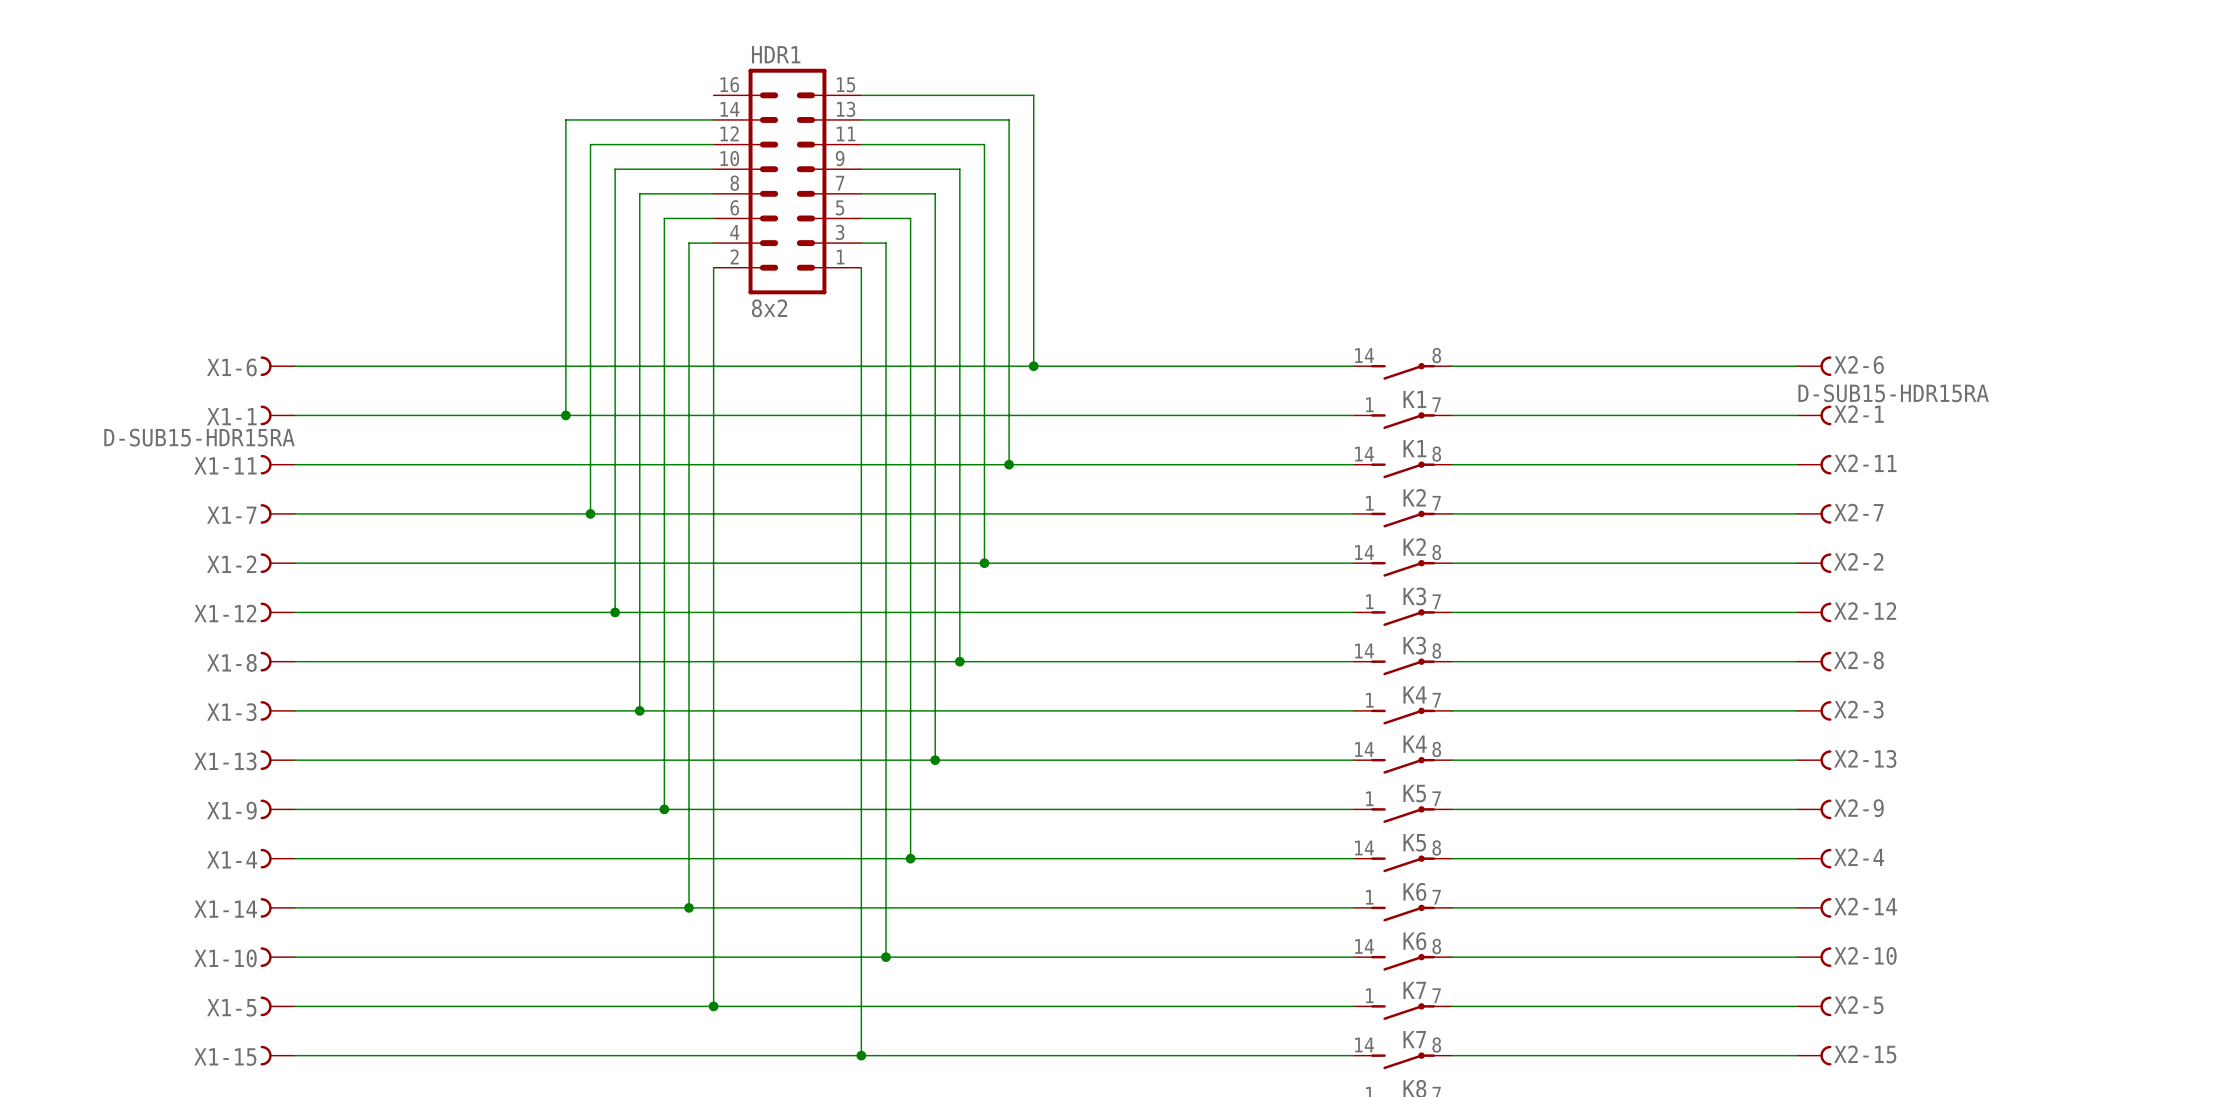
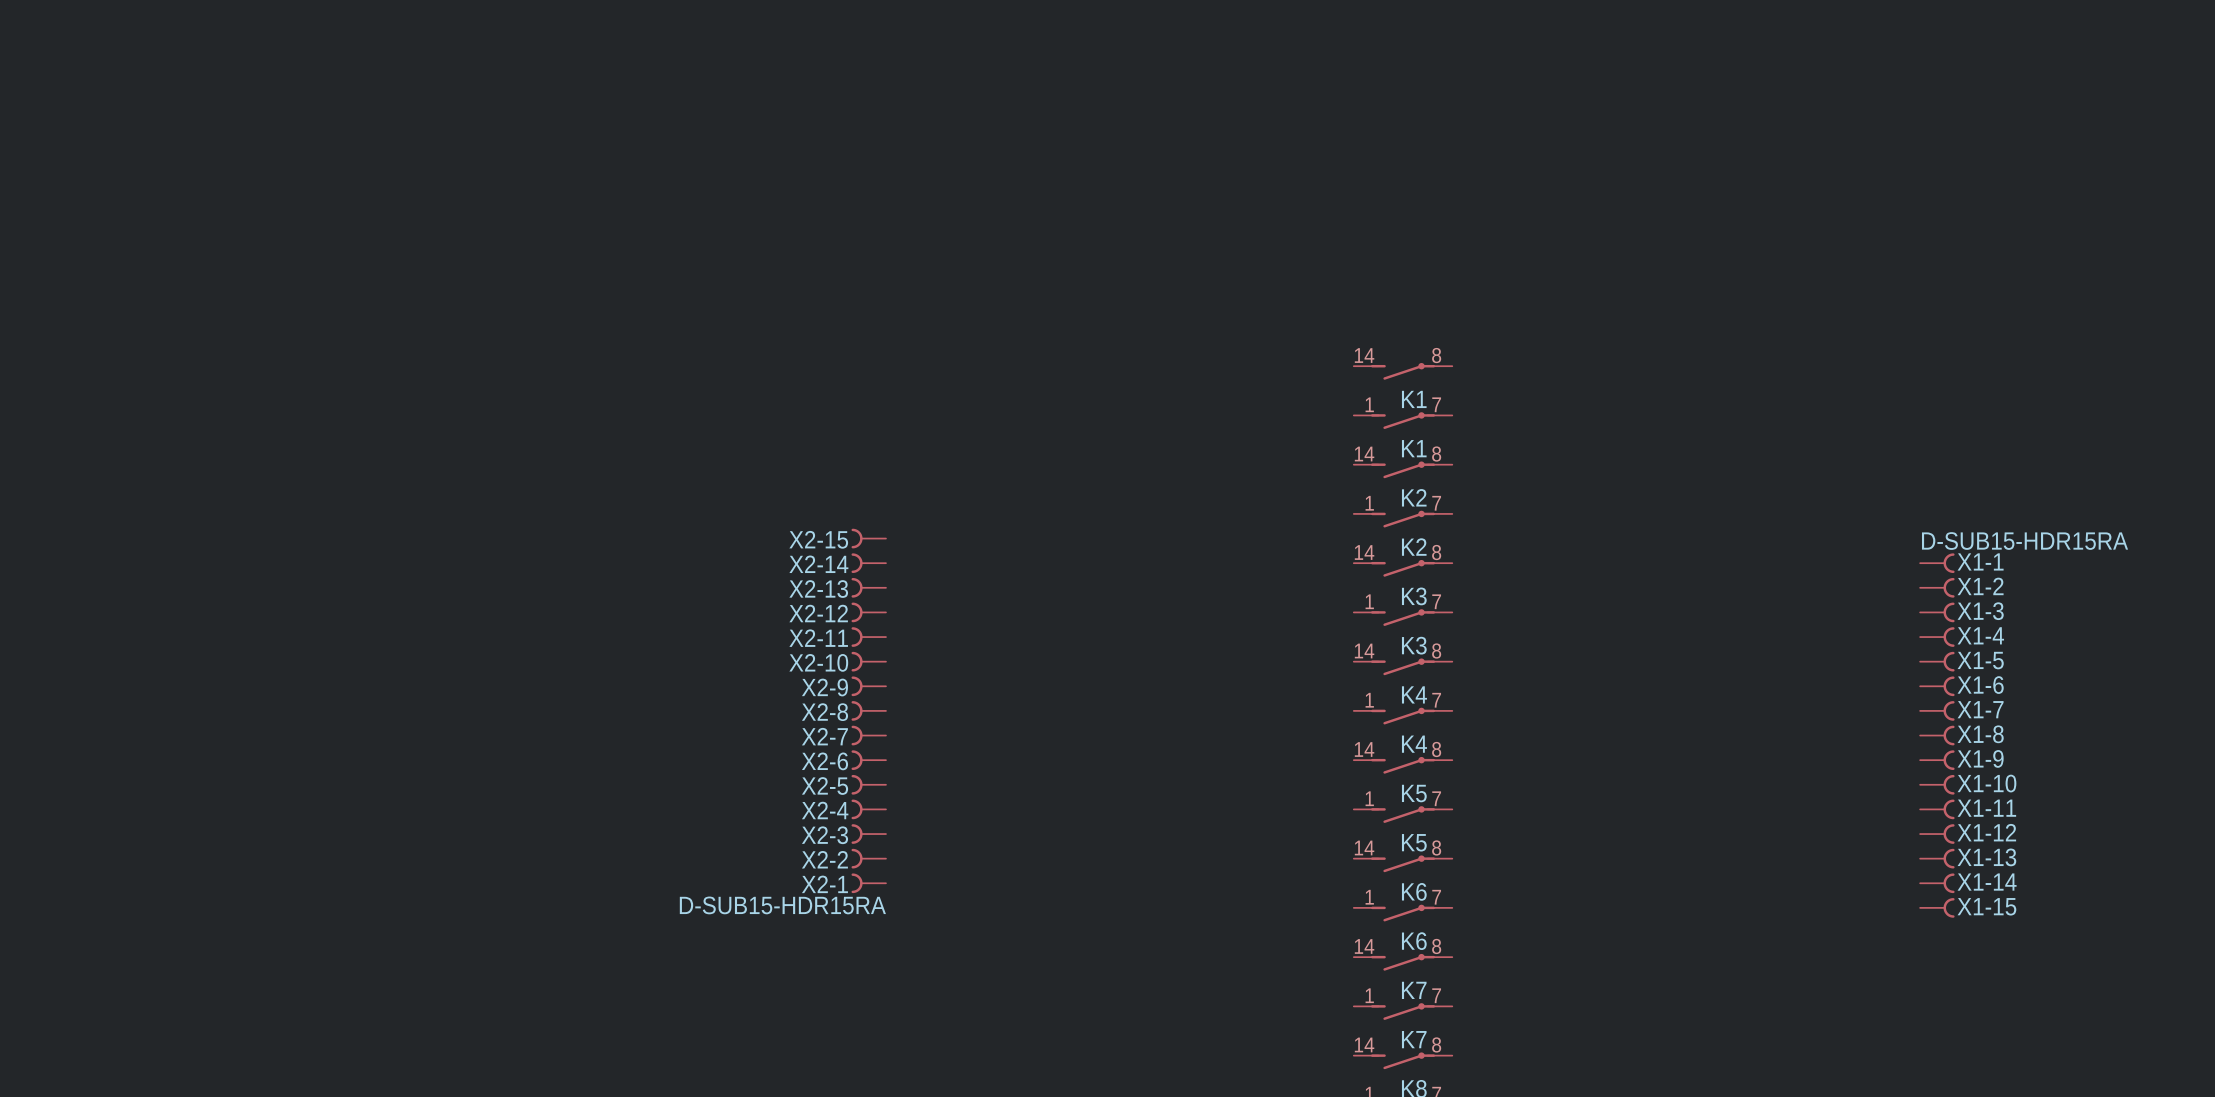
wire: (861, 95) (1033, 95) (1033, 366) -> none
wire: (713, 119) (565, 119) (565, 415) -> none
wire: (861, 119) (1009, 119) (1009, 464) -> none
wire: (713, 144) (590, 144) (590, 513) -> none
wire: (861, 144) (984, 144) (984, 563) -> none
wire: (713, 169) (615, 169) (615, 612) -> none
wire: (861, 169) (959, 169) (959, 661) -> none
HDR1: 8x2 (787, 181) -> none
wire: (713, 193) (639, 193) (639, 710) -> none
wire: (861, 193) (935, 193) (935, 760) -> none
wire: (713, 218) (664, 218) (664, 809) -> none
wire: (861, 218) (910, 218) (910, 858) -> none
wire: (713, 243) (688, 243) (688, 907) -> none
wire: (861, 243) (885, 243) (885, 957) -> none
wire: (713, 267) (713, 1006) -> none
wire: (861, 267) (861, 1055) -> none
X1-6 rotation: 0° (266, 366) -> 180° (1949, 686)
X1-6 position: (277, 366) -> (1937, 686)
wire: (295, 366) (1353, 366) -> none
junction: (1033, 366) -> none
wire: (1452, 366) (1797, 366) -> none
X2-6 position: (1814, 366) -> (868, 760)
X2-6 rotation: 0° (1825, 366) -> 180° (857, 760)
X1-1 rotation: 0° (266, 415) -> 180° (1949, 563)
X1-1 position: (277, 415) -> (1937, 563)
wire: (295, 415) (1353, 415) -> none
junction: (565, 415) -> none
wire: (1452, 415) (1797, 415) -> none
X2-1 position: (1814, 415) -> (868, 883)
X2-1 rotation: 0° (1825, 415) -> 180° (857, 883)
X1-11 rotation: 0° (266, 464) -> 180° (1949, 809)
X1-11 position: (277, 464) -> (1937, 809)
wire: (295, 464) (1353, 464) -> none
junction: (1009, 464) -> none
wire: (1452, 464) (1797, 464) -> none
X2-11 position: (1814, 464) -> (868, 637)
X2-11 rotation: 0° (1825, 464) -> 180° (857, 637)
X1-7 rotation: 0° (266, 513) -> 180° (1949, 710)
X1-7 position: (277, 513) -> (1937, 710)
wire: (295, 513) (1353, 513) -> none
junction: (590, 513) -> none
wire: (1452, 513) (1797, 513) -> none
X2-7 position: (1814, 513) -> (868, 735)
X2-7 rotation: 0° (1825, 513) -> 180° (857, 735)
X1-2 rotation: 0° (266, 563) -> 180° (1949, 587)
X1-2 position: (277, 563) -> (1937, 587)
wire: (295, 563) (1353, 563) -> none
junction: (984, 563) -> none
wire: (1452, 563) (1797, 563) -> none
X2-2 position: (1814, 563) -> (868, 858)
X2-2 rotation: 0° (1825, 563) -> 180° (857, 858)
X1-12 rotation: 0° (266, 612) -> 180° (1949, 834)
X1-12 position: (277, 612) -> (1937, 834)
wire: (295, 612) (1353, 612) -> none
junction: (615, 612) -> none
wire: (1452, 612) (1797, 612) -> none
X2-12 position: (1814, 612) -> (868, 612)
X2-12 rotation: 0° (1825, 612) -> 180° (857, 612)
X1-8 rotation: 0° (266, 661) -> 180° (1949, 735)
X1-8 position: (277, 661) -> (1937, 735)
wire: (295, 661) (1353, 661) -> none
junction: (959, 661) -> none
wire: (1452, 661) (1797, 661) -> none
X2-8 position: (1814, 661) -> (868, 710)
X2-8 rotation: 0° (1825, 661) -> 180° (857, 710)
X1-3 rotation: 0° (266, 710) -> 180° (1949, 612)
X1-3 position: (277, 710) -> (1937, 612)
wire: (295, 710) (1353, 710) -> none
junction: (639, 710) -> none
wire: (1452, 710) (1797, 710) -> none
X2-3 position: (1814, 710) -> (868, 834)
X2-3 rotation: 0° (1825, 710) -> 180° (857, 834)
X1-13 rotation: 0° (266, 760) -> 180° (1949, 858)
X1-13 position: (277, 760) -> (1937, 858)
wire: (295, 760) (1353, 760) -> none
junction: (935, 760) -> none
wire: (1452, 760) (1797, 760) -> none
X2-13 position: (1814, 760) -> (868, 587)
X2-13 rotation: 0° (1825, 760) -> 180° (857, 587)
X1-9 rotation: 0° (266, 809) -> 180° (1949, 760)
X1-9 position: (277, 809) -> (1937, 760)
wire: (295, 809) (1353, 809) -> none
junction: (664, 809) -> none
wire: (1452, 809) (1797, 809) -> none
X2-9 position: (1814, 809) -> (868, 686)
X2-9 rotation: 0° (1825, 809) -> 180° (857, 686)
X1-4 rotation: 0° (266, 858) -> 180° (1949, 637)
X1-4 position: (277, 858) -> (1937, 637)
wire: (295, 858) (1353, 858) -> none
junction: (910, 858) -> none
wire: (1452, 858) (1797, 858) -> none
X2-4 position: (1814, 858) -> (868, 809)
X2-4 rotation: 0° (1825, 858) -> 180° (857, 809)
X1-14 rotation: 0° (266, 907) -> 180° (1949, 883)
X1-14 position: (277, 907) -> (1937, 883)
wire: (295, 907) (1353, 907) -> none
junction: (688, 907) -> none
wire: (1452, 907) (1797, 907) -> none
X2-14 position: (1814, 907) -> (868, 563)
X2-14 rotation: 0° (1825, 907) -> 180° (857, 563)
X1-10 rotation: 0° (266, 957) -> 180° (1949, 784)
X1-10 position: (277, 957) -> (1937, 784)
wire: (295, 957) (1353, 957) -> none
junction: (885, 957) -> none
wire: (1452, 957) (1797, 957) -> none
X2-10 position: (1814, 957) -> (868, 661)
X2-10 rotation: 0° (1825, 957) -> 180° (857, 661)
X1-5 rotation: 0° (266, 1006) -> 180° (1949, 661)
X1-5 position: (277, 1006) -> (1937, 661)
wire: (295, 1006) (1353, 1006) -> none
junction: (713, 1006) -> none
wire: (1452, 1006) (1797, 1006) -> none
X2-5 position: (1814, 1006) -> (868, 784)
X2-5 rotation: 0° (1825, 1006) -> 180° (857, 784)
X1-15 rotation: 0° (266, 1055) -> 180° (1949, 907)
X1-15 position: (277, 1055) -> (1937, 907)
wire: (295, 1055) (1353, 1055) -> none
junction: (861, 1055) -> none
wire: (1452, 1055) (1797, 1055) -> none
X2-15 position: (1814, 1055) -> (868, 538)
X2-15 rotation: 0° (1825, 1055) -> 180° (857, 538)

